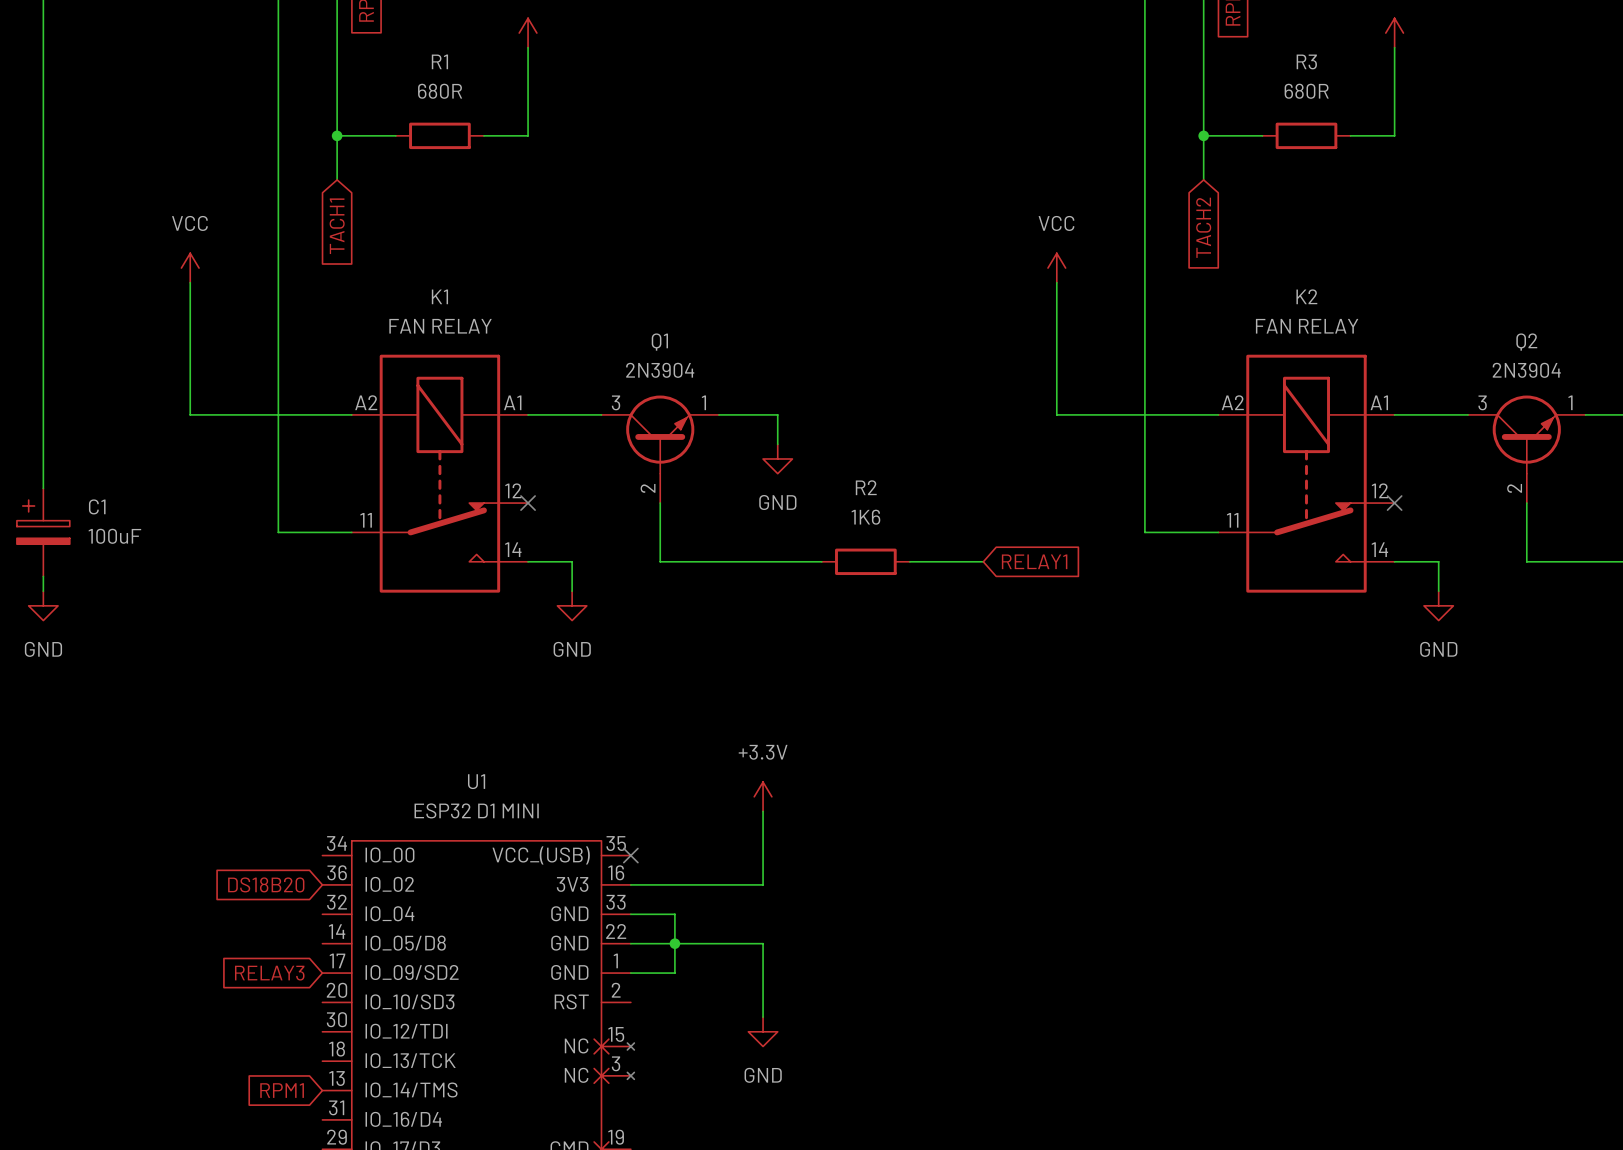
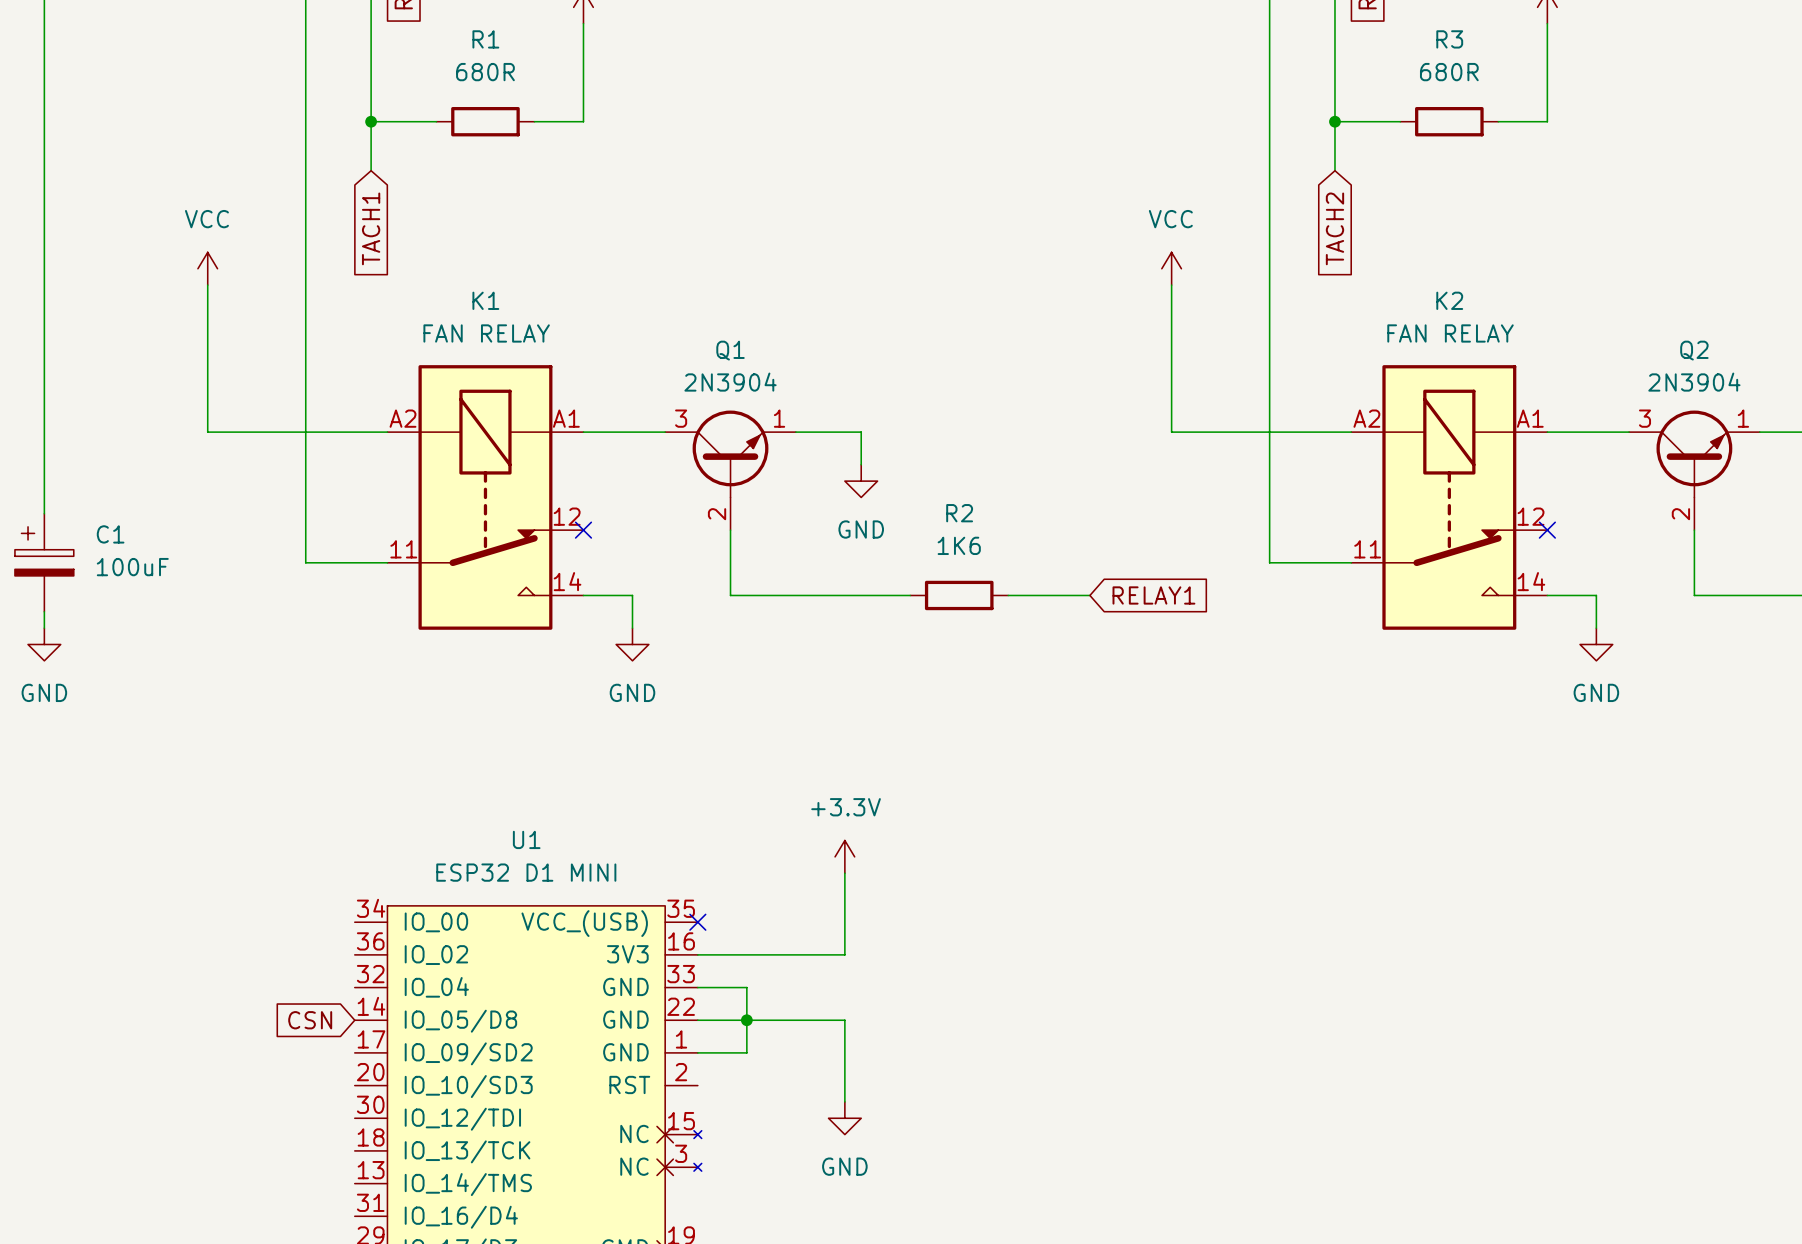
global label: DS18B20 (266, 884) -> none
global label: none -> CSN (310, 1020)
global label: RELAY3 (269, 973) -> none
global label: RPM1 (282, 1090) -> none

